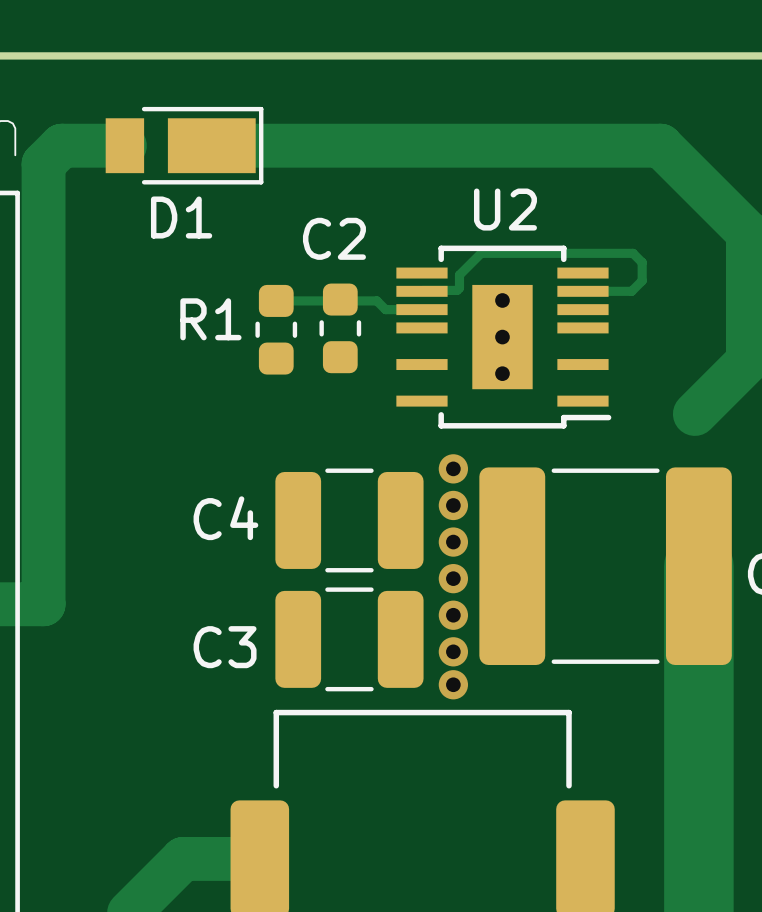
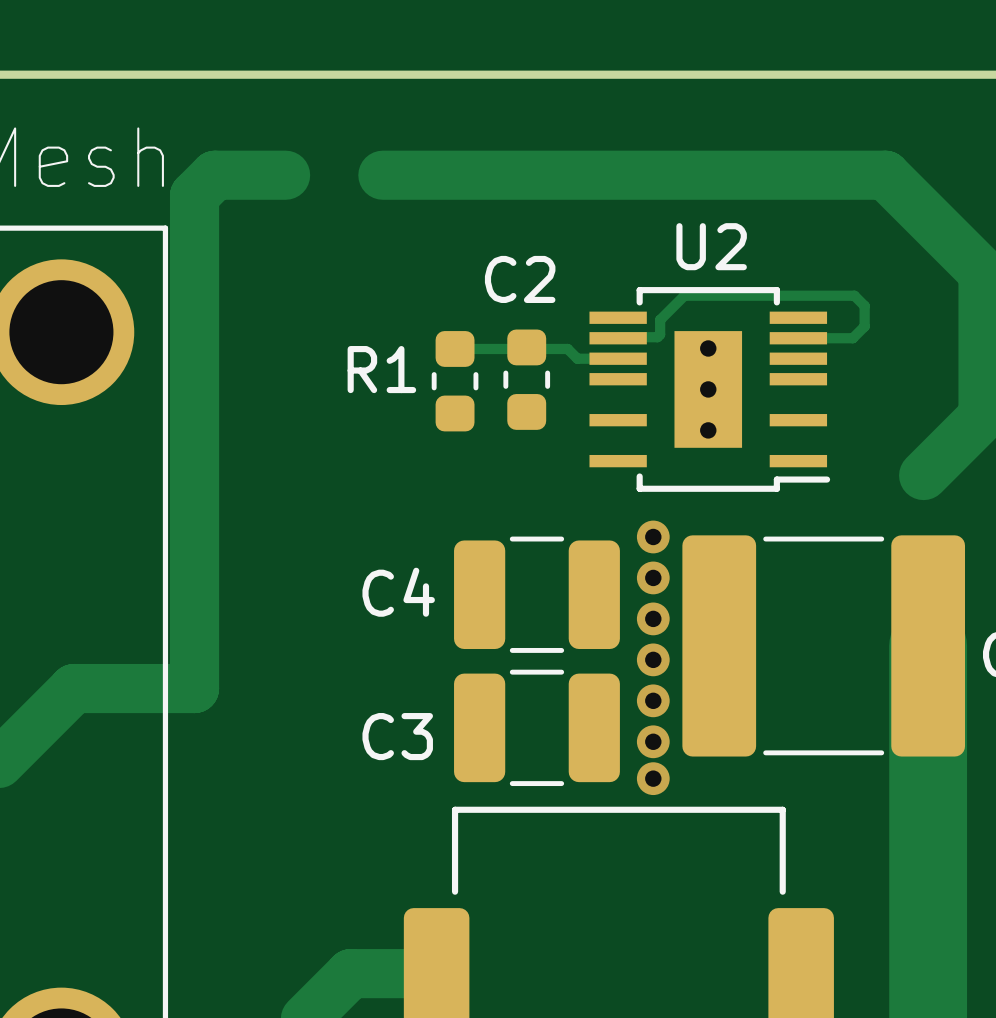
D1: (184, 145) -> none

